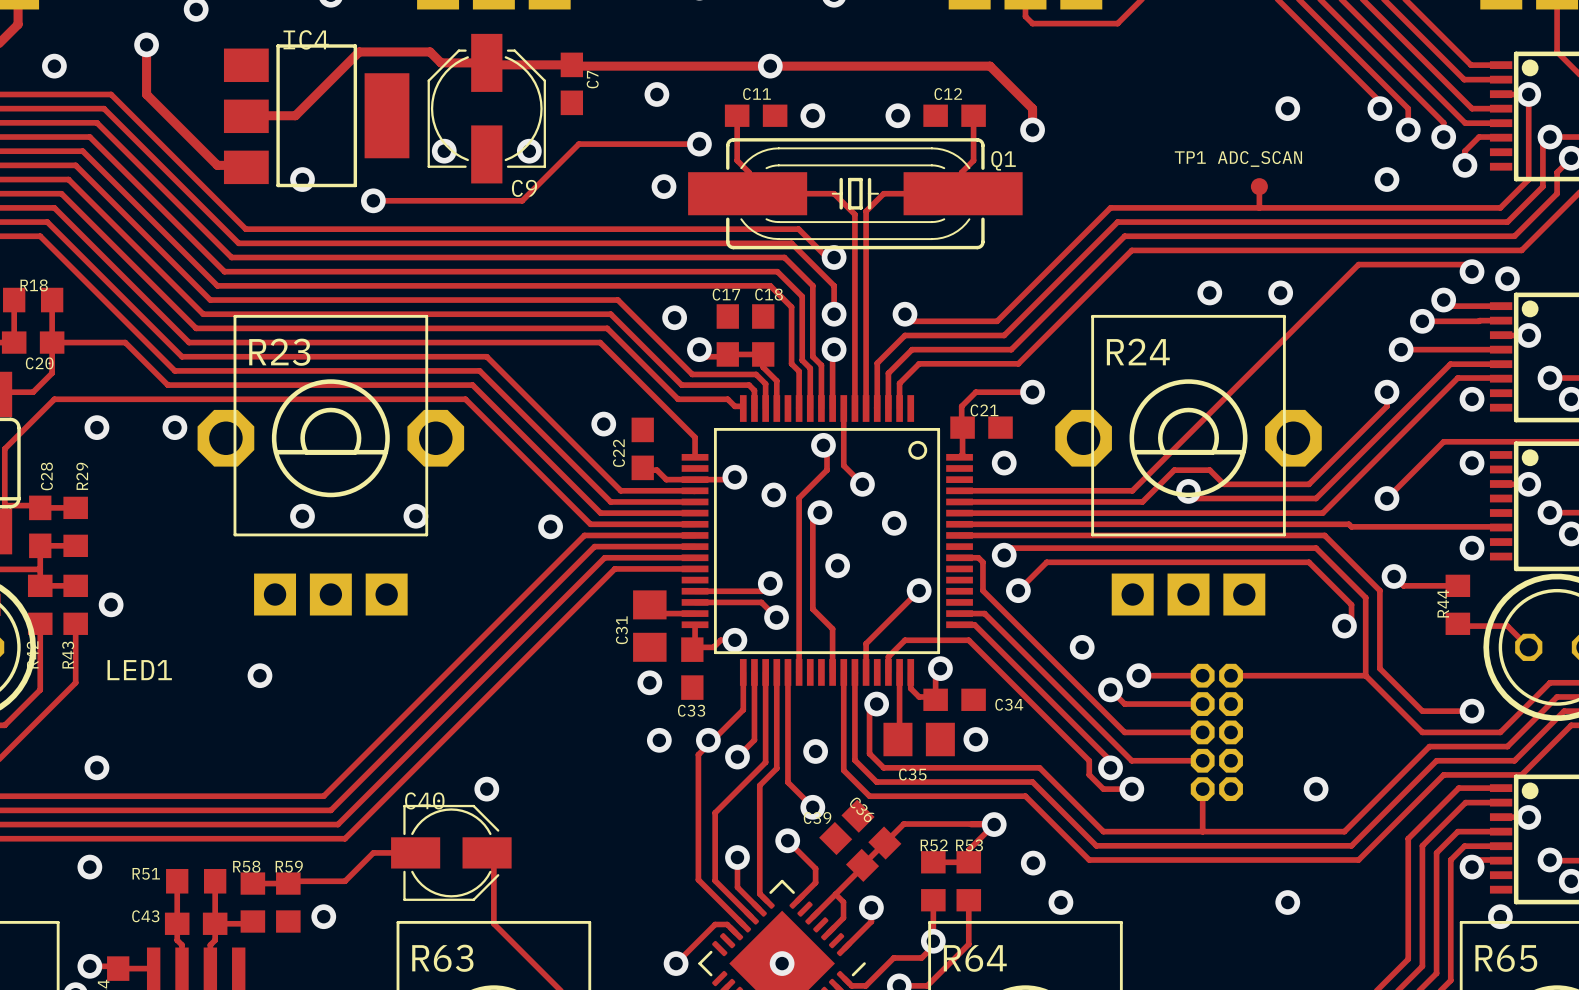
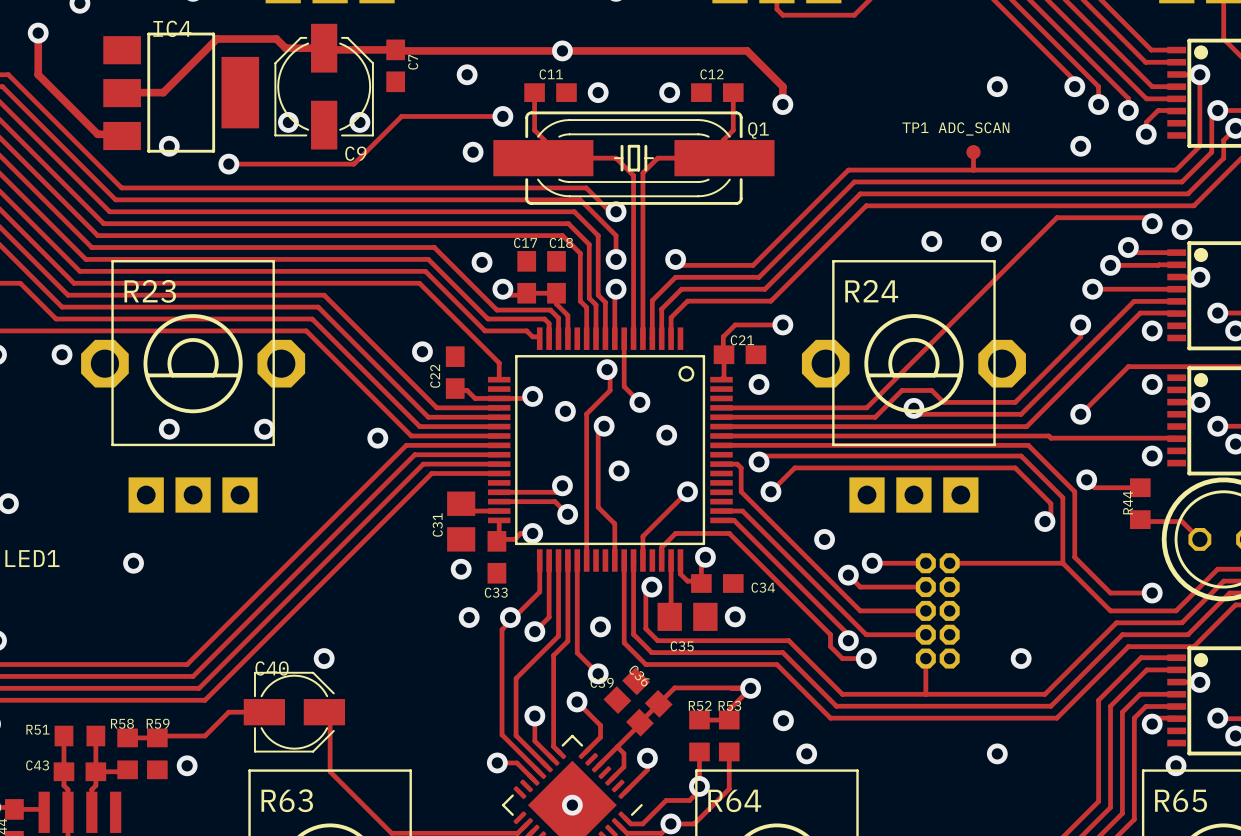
track: (727, 924) (715, 924) (676, 963) -> (526, 772) (516, 762) (497, 762)
via position: (676, 963) -> (497, 762)

